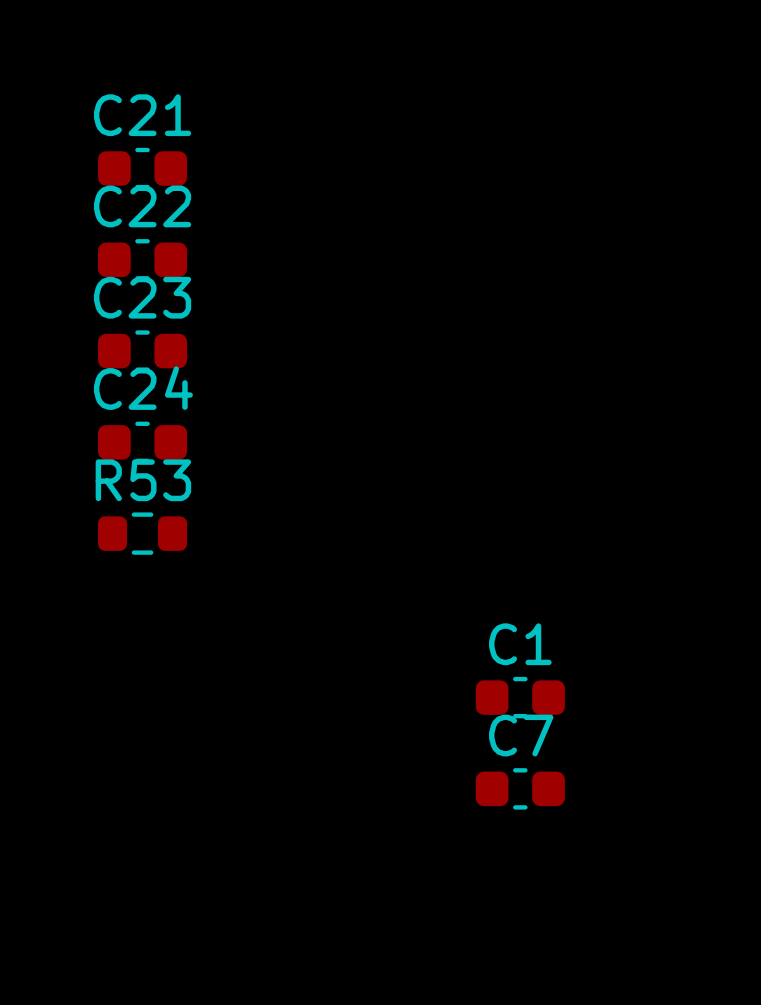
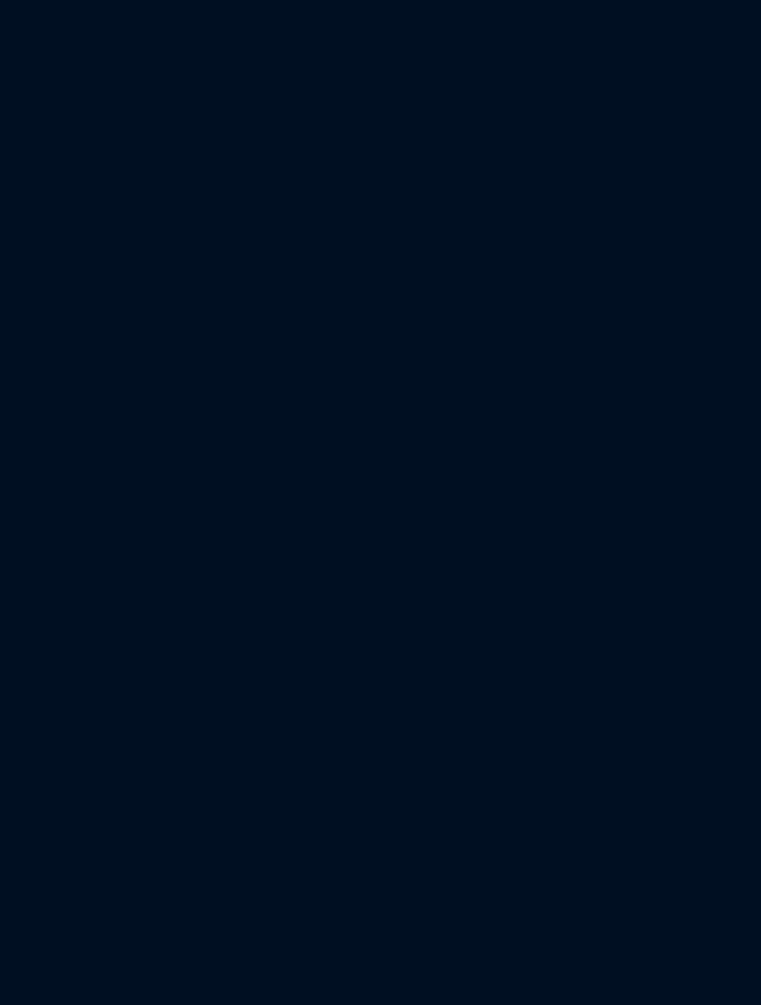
C21: (142, 168) -> none
C22: (142, 259) -> none
C23: (142, 351) -> none
C24: (142, 442) -> none
R53: (142, 533) -> none
C1: (520, 697) -> none
C7: (520, 788) -> none

